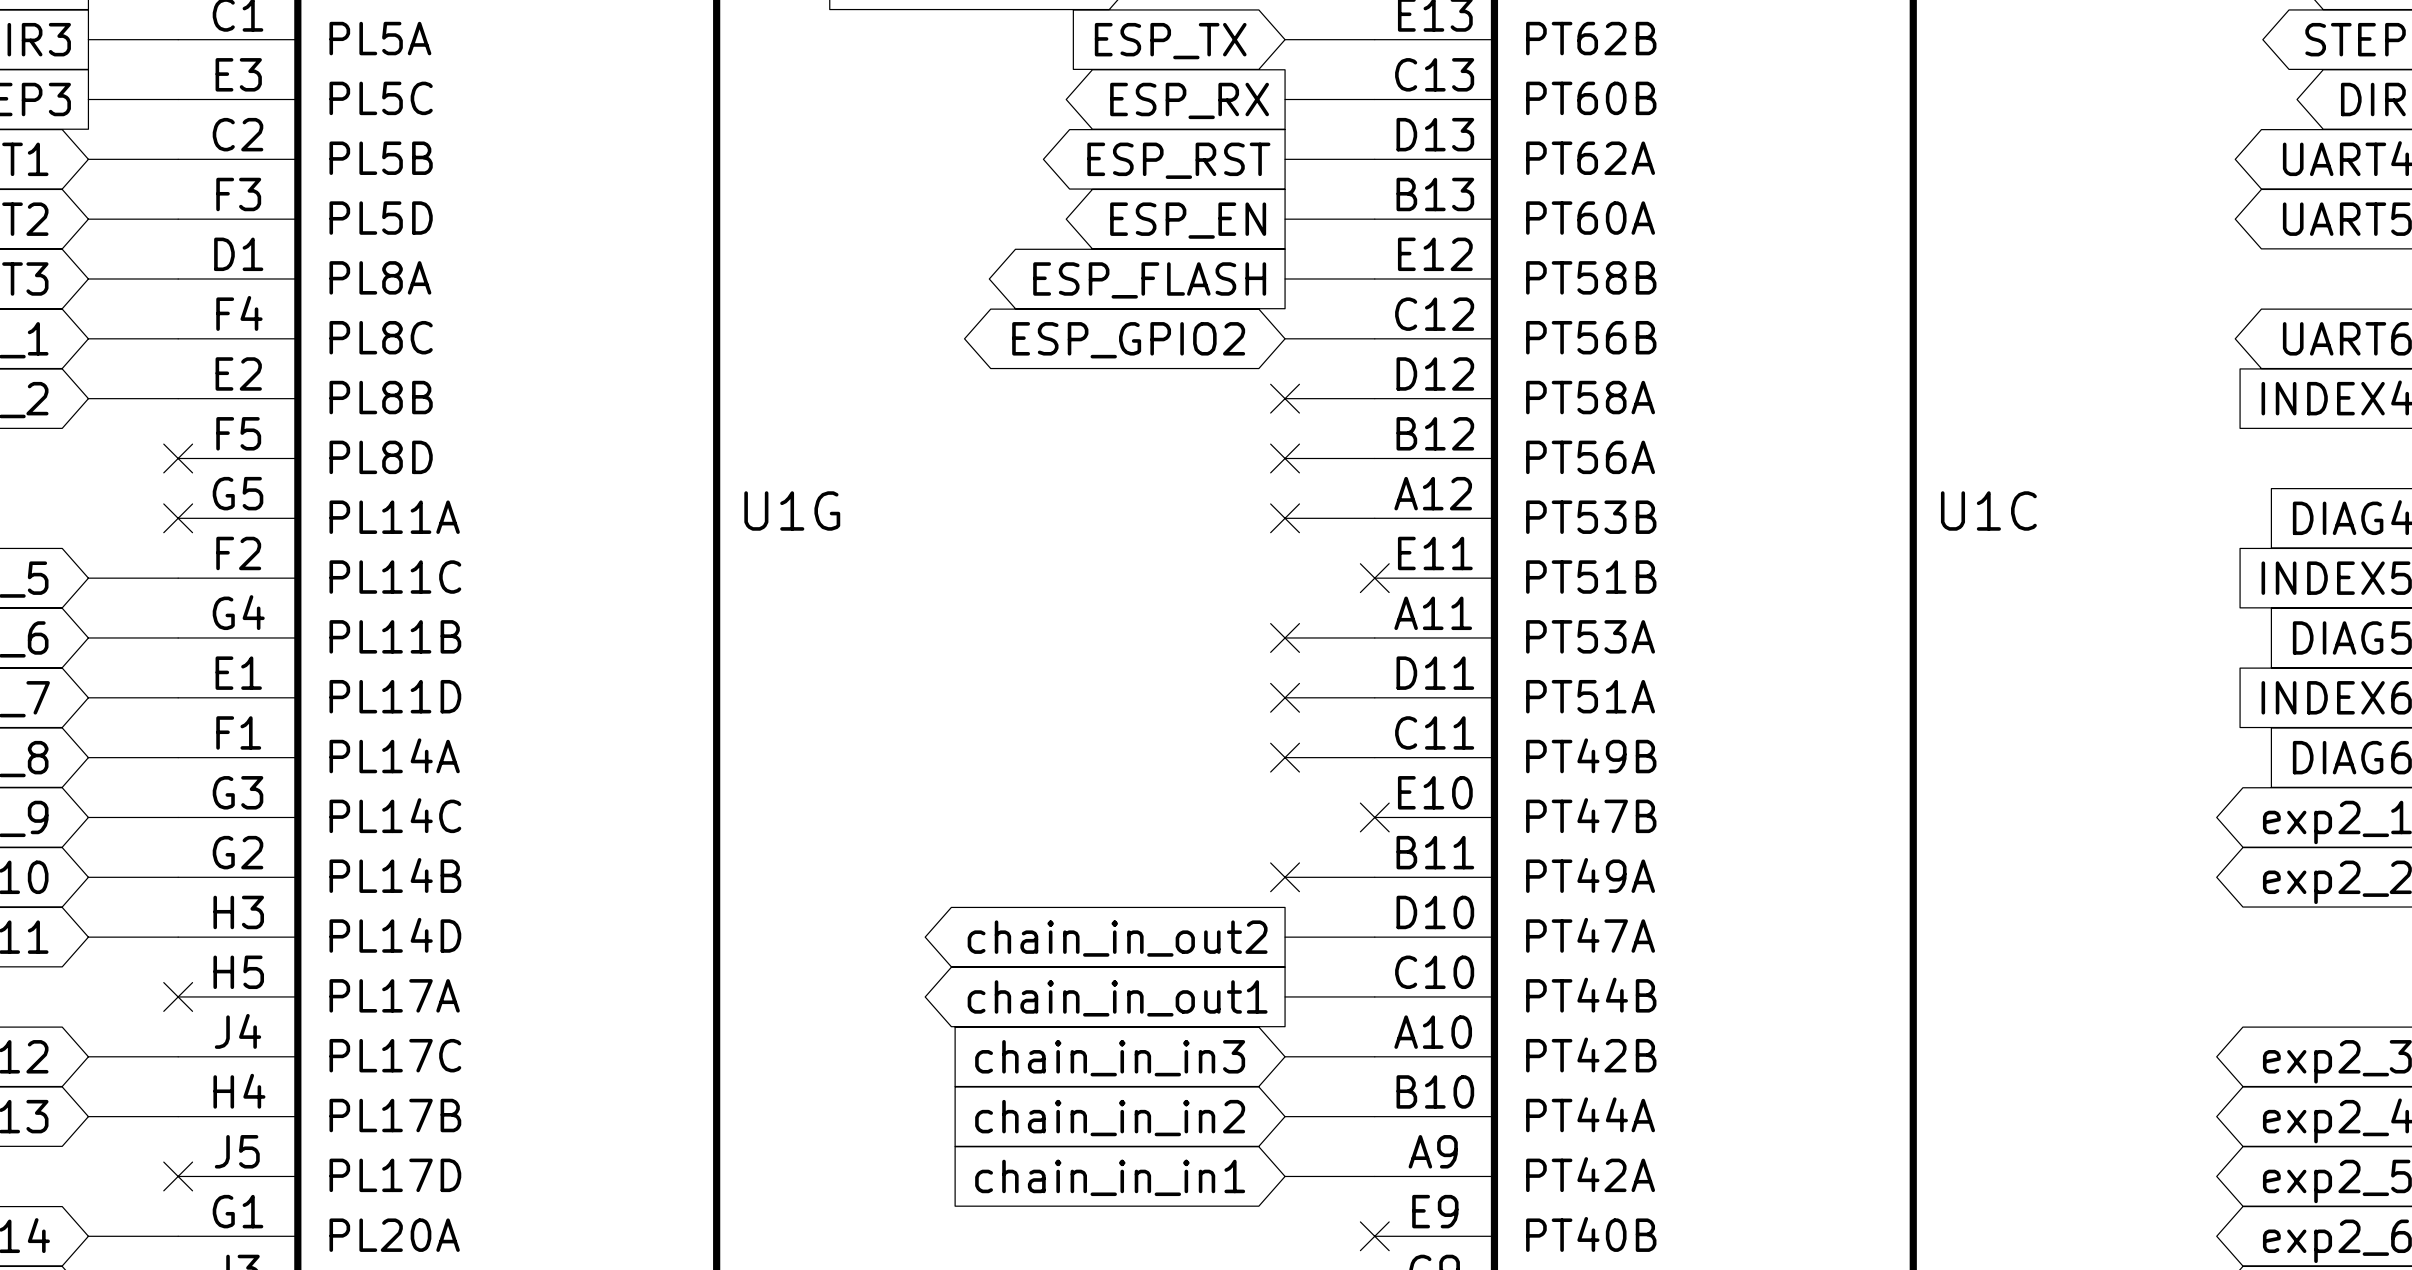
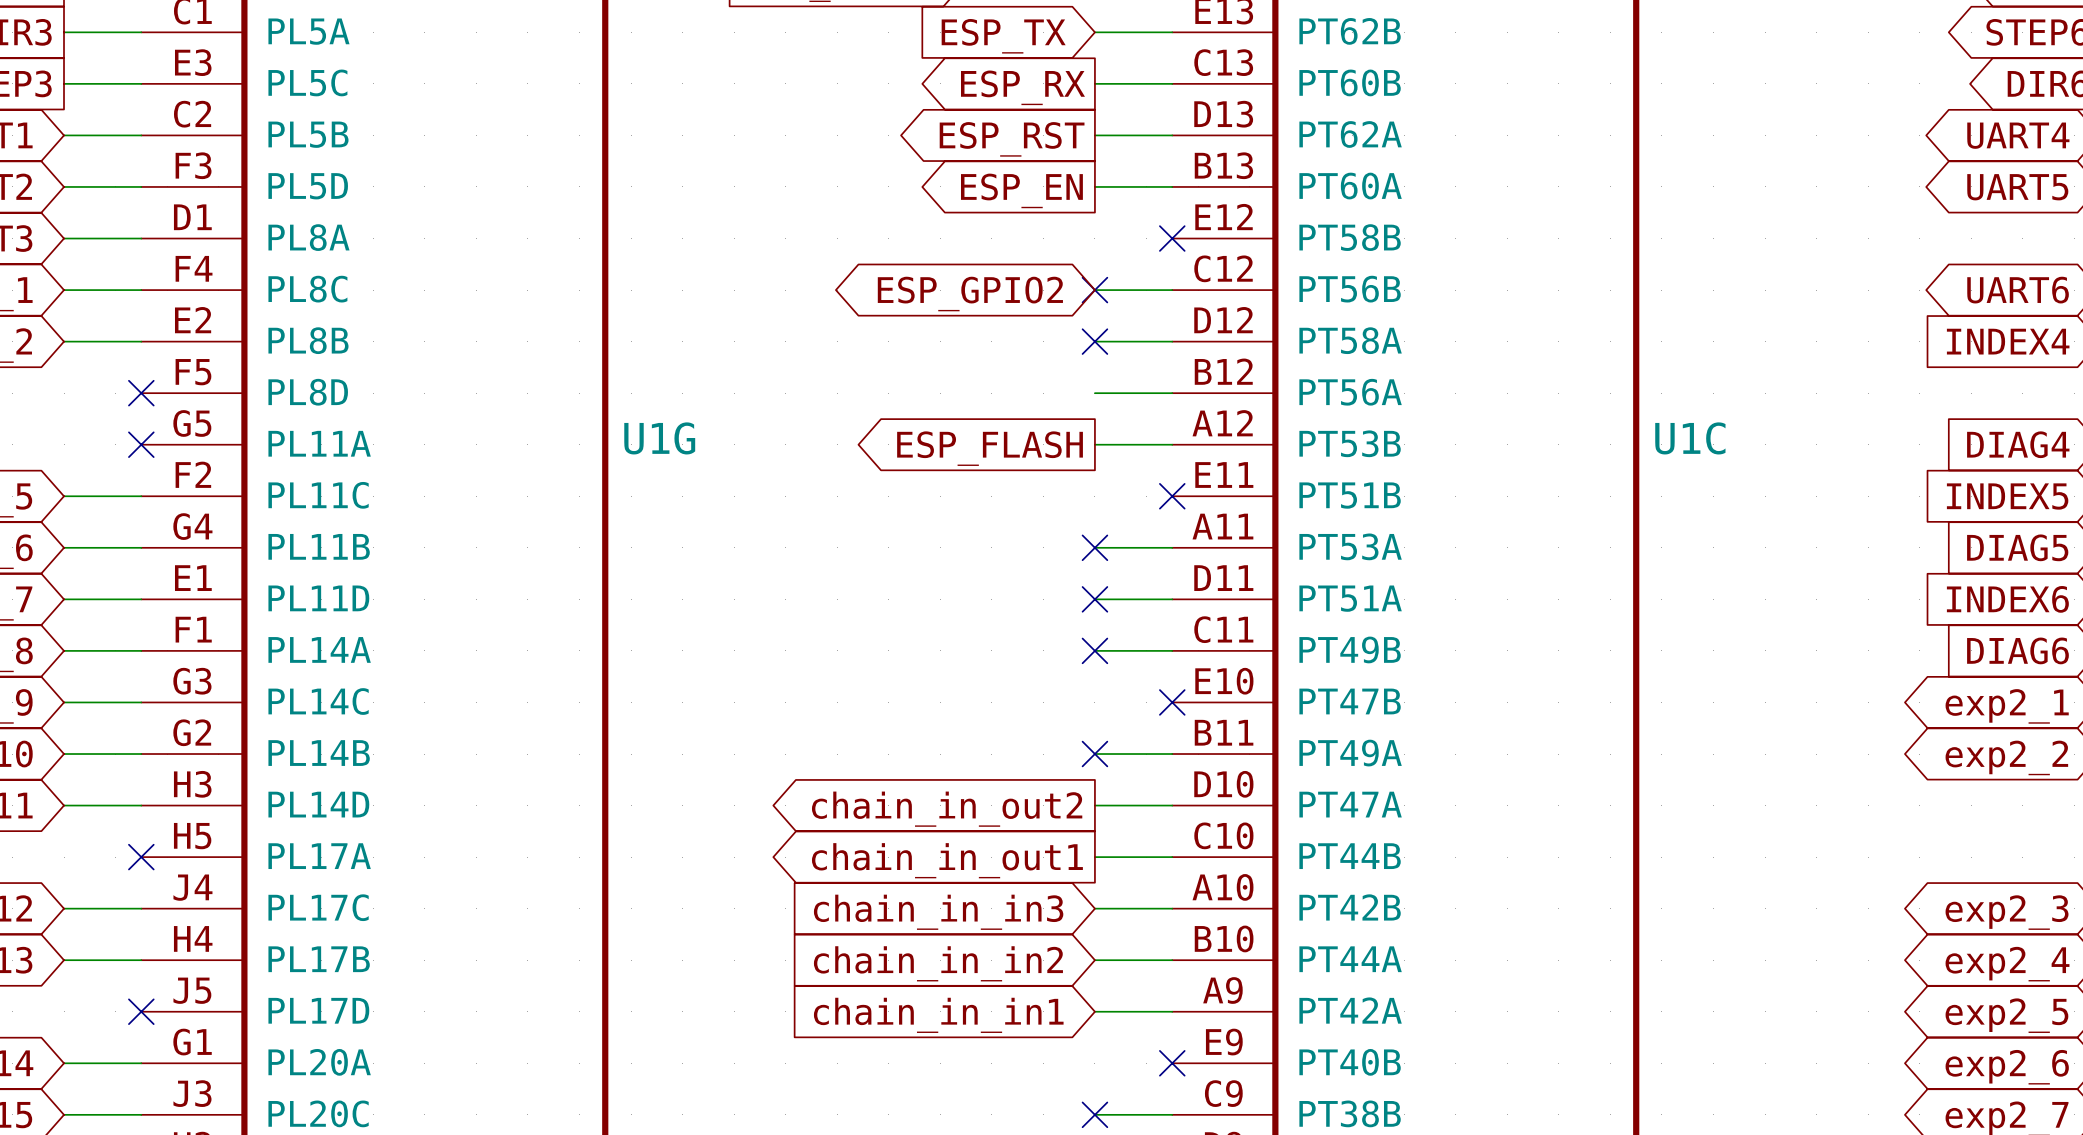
wire: (1285, 278) (1374, 278) -> none
no-connect mark: none -> (1172, 238)
global label position: ESP_FLASH (1149, 280) -> ESP_FLASH (990, 448)
no-connect mark: none -> (1094, 290)
no-connect mark: (1285, 458) -> none
no-connect mark: (1285, 518) -> none

